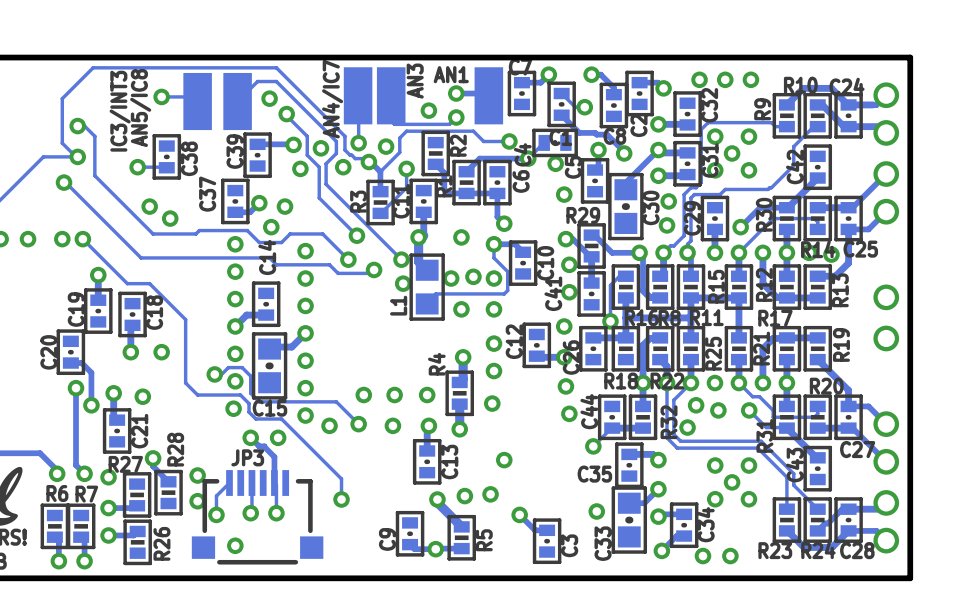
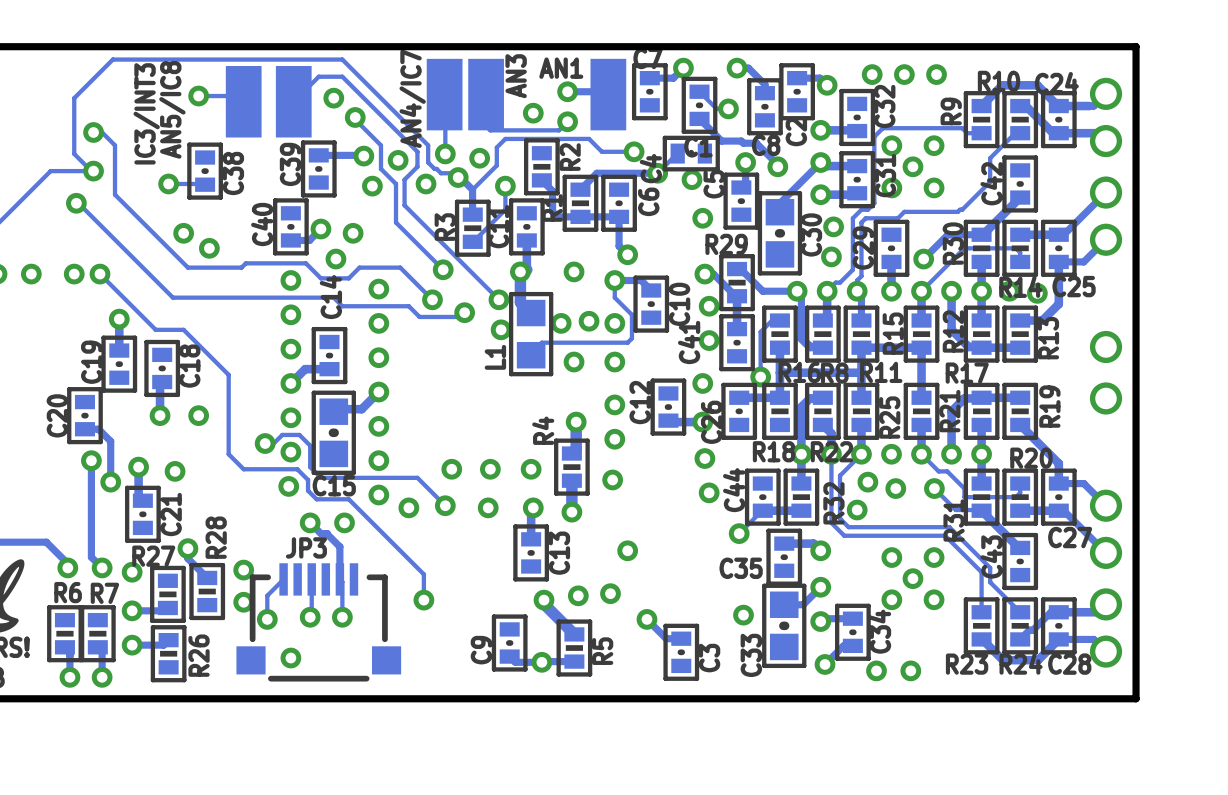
C37 name: C37 (207, 194) -> C40 (262, 224)

